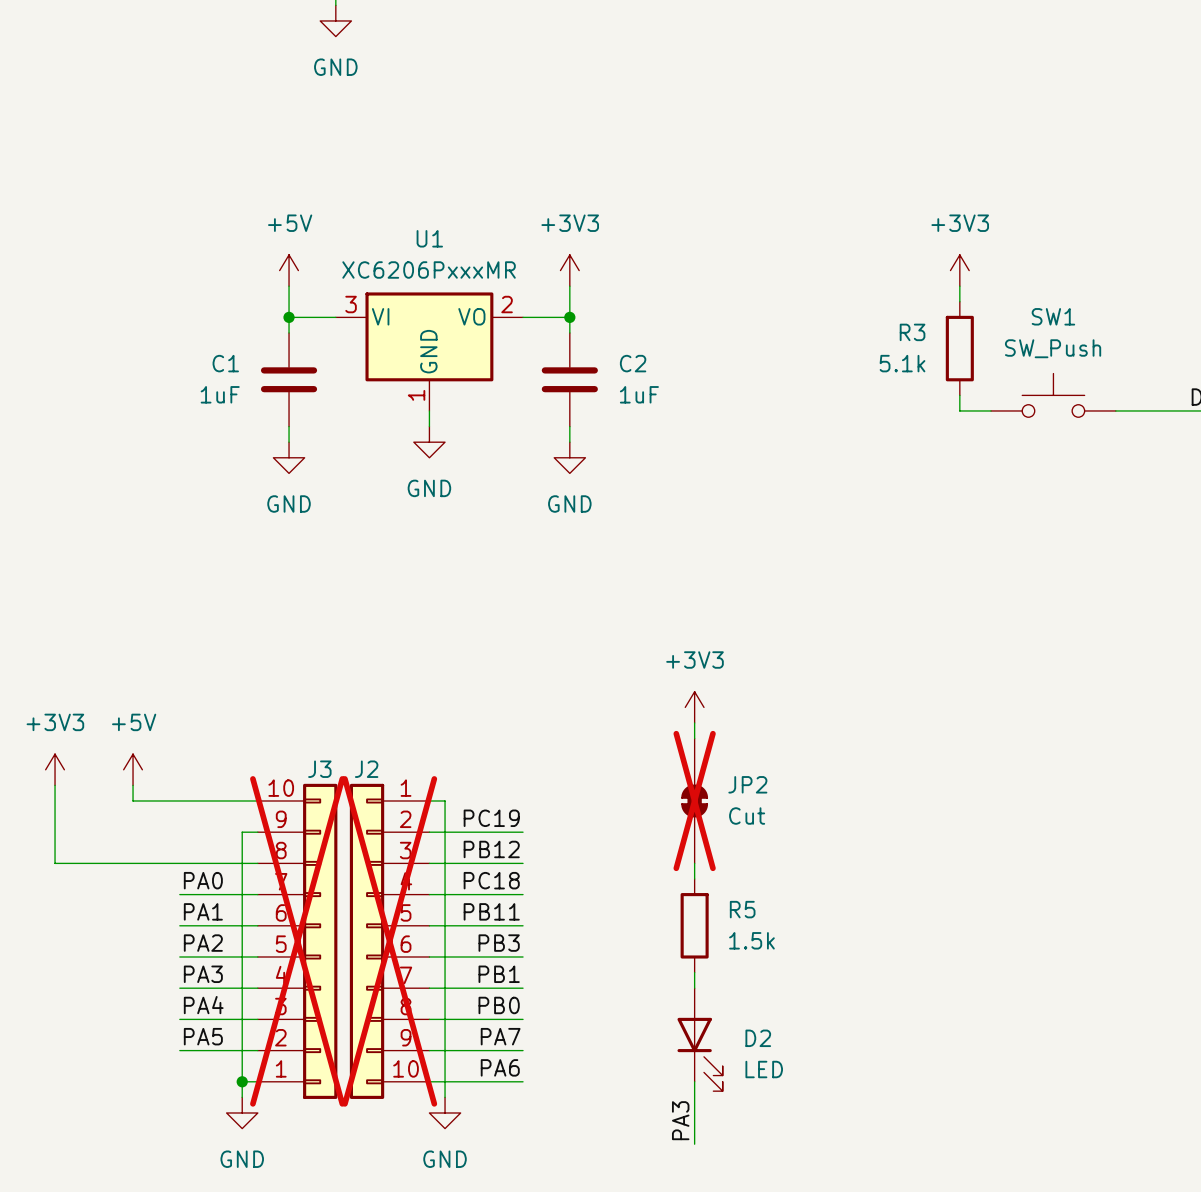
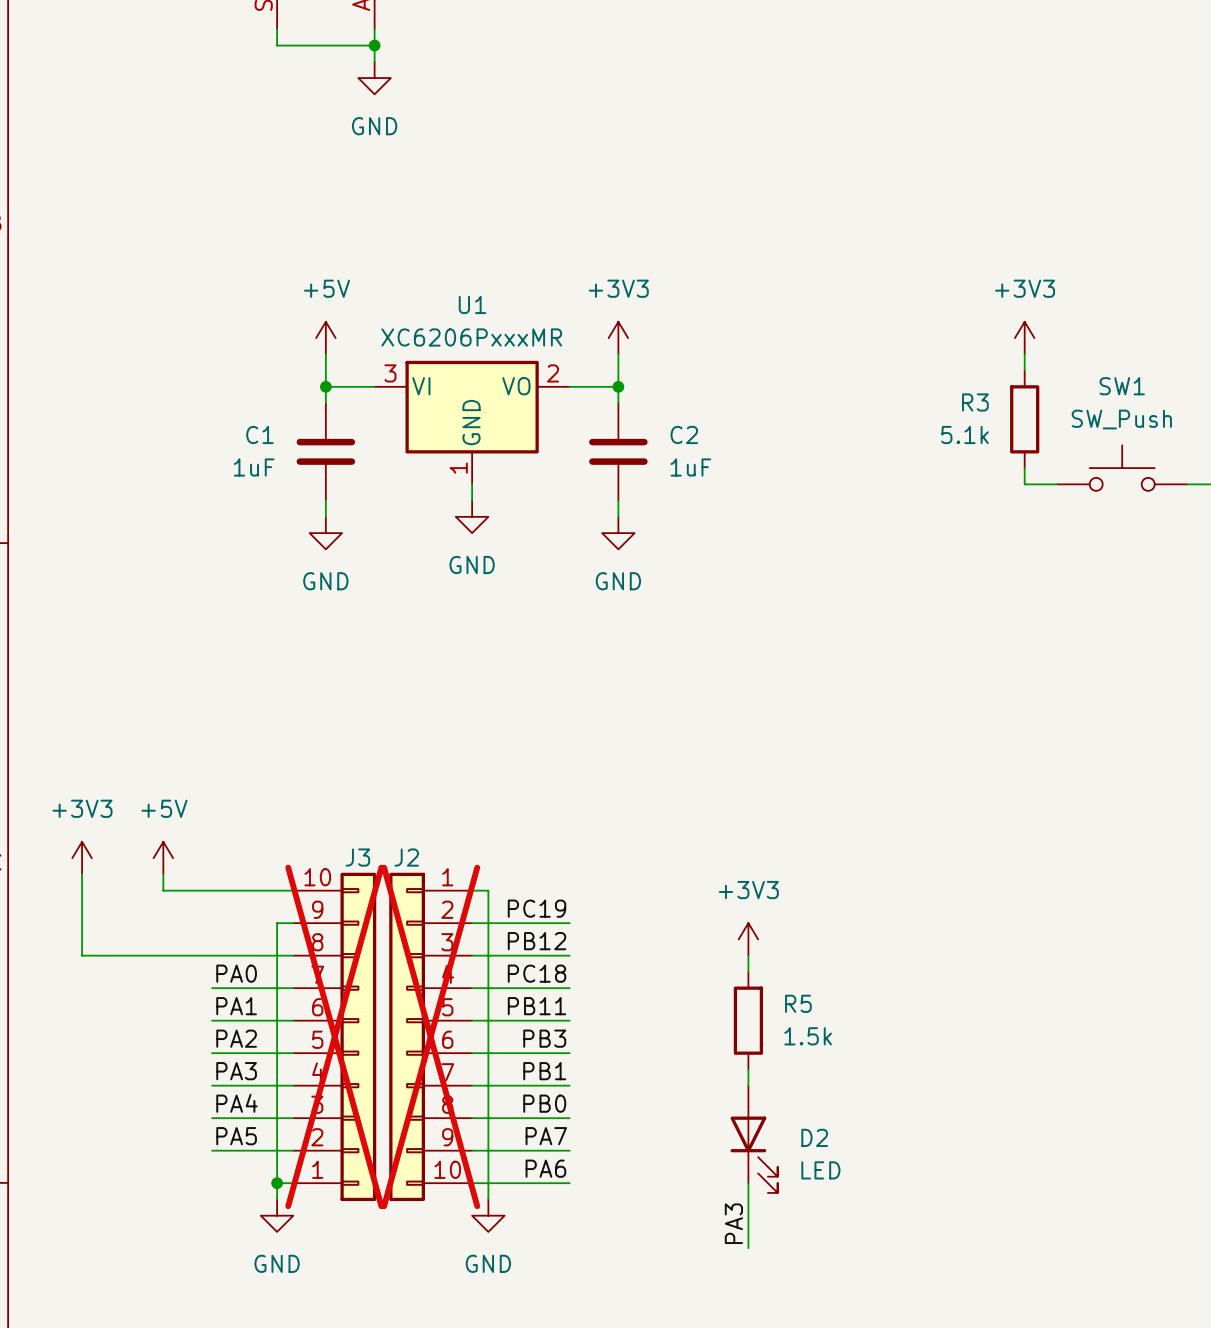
power symbol position: +3V3 (694, 707) -> +3V3 (748, 939)
wire: (694, 722) (694, 738) -> none
JP2: Cut (694, 800) -> none

